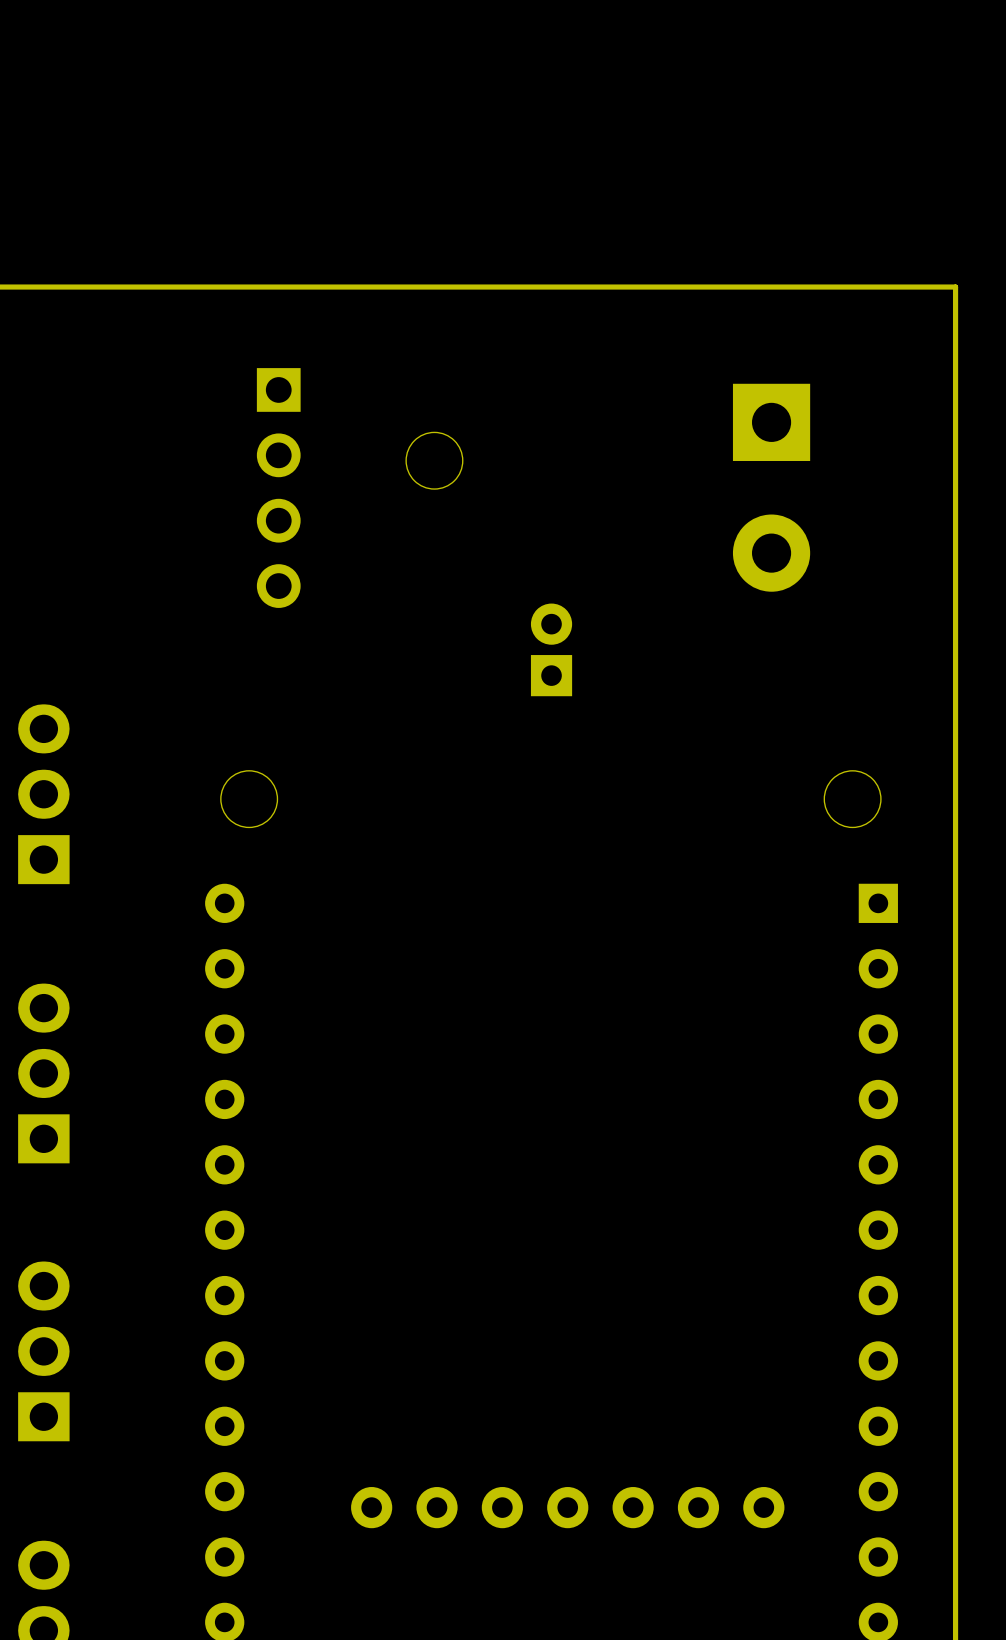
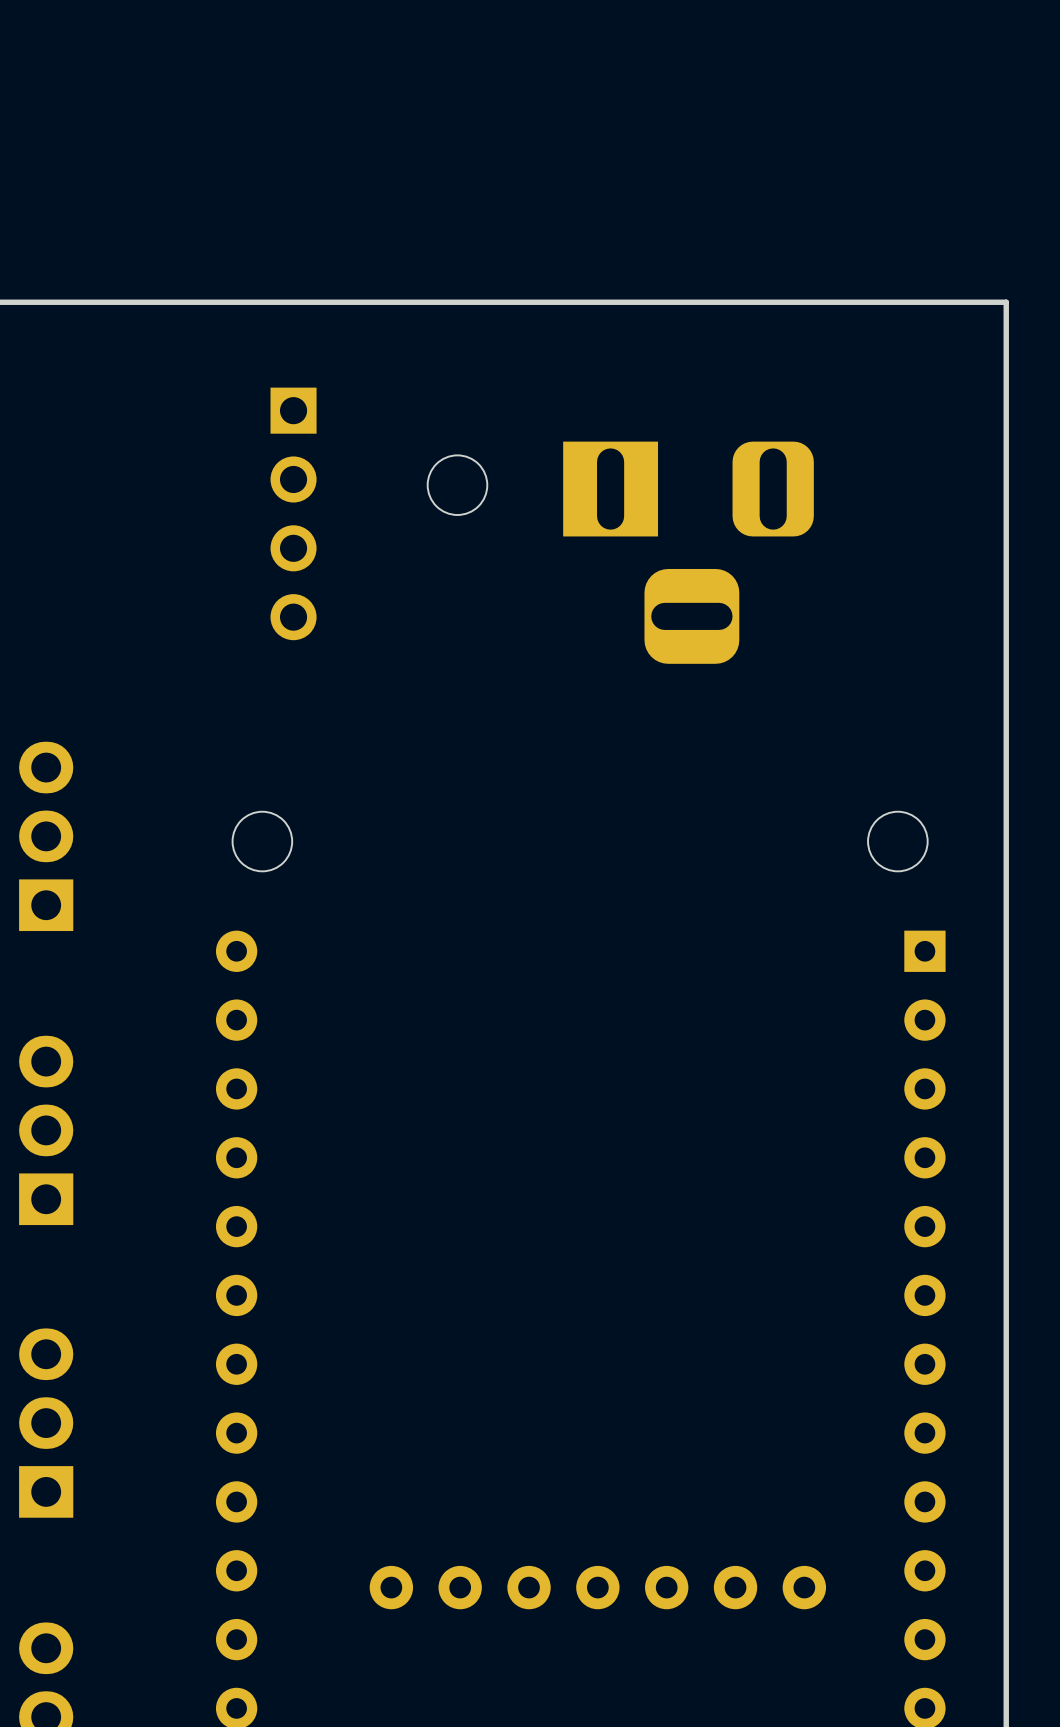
part: (771, 487) -> none
part: none -> (688, 552)
part: (551, 649) -> none

